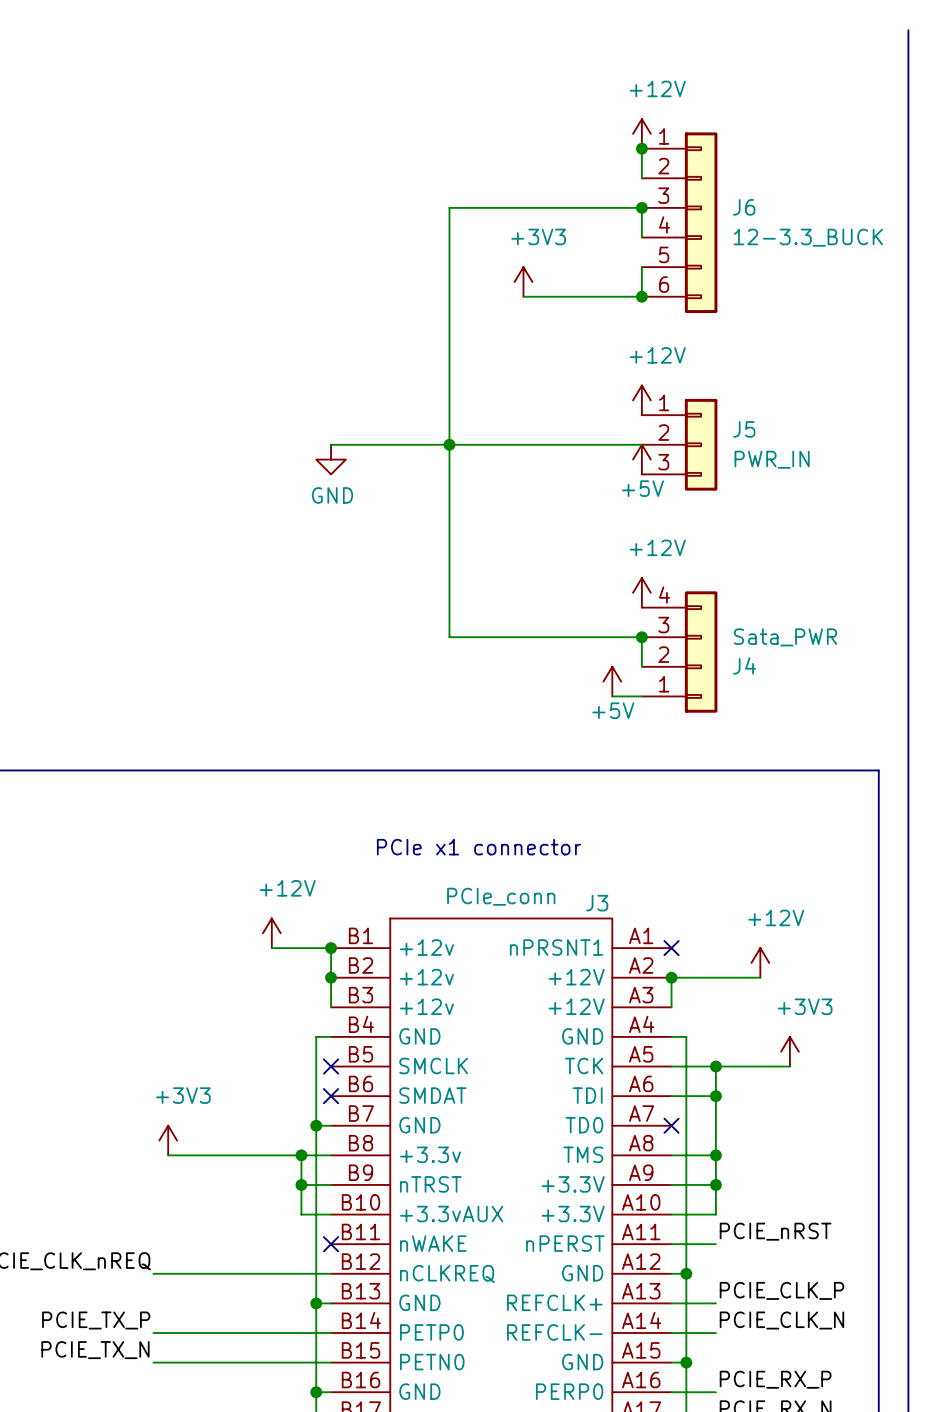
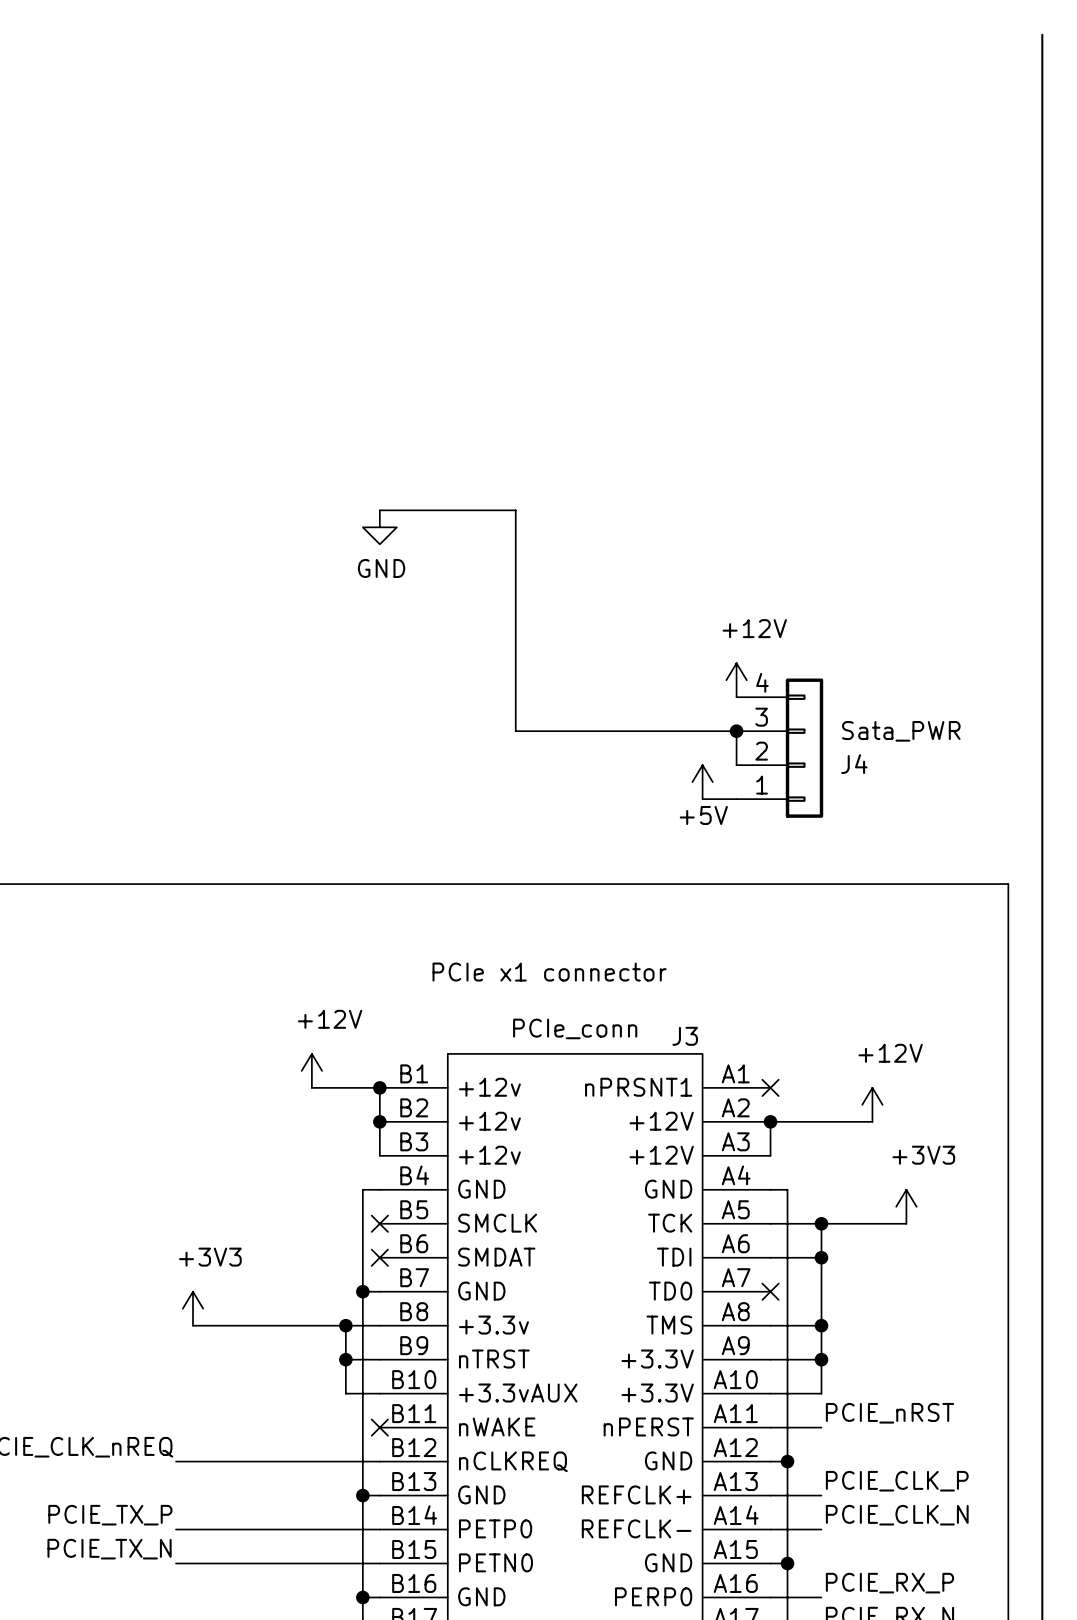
power symbol: +12V (641, 133) -> none
wire: (641, 148) (641, 178) -> none
junction: (641, 148) -> none
junction: (641, 207) -> none
J6: 12-3.3_BUCK (679, 222) -> none
wire: (641, 237) (641, 207) (449, 207) (449, 444) (641, 444) -> none
wire: (641, 267) (641, 296) (523, 296) -> none
power symbol: +3V3 (523, 281) -> none
junction: (641, 296) -> none
power symbol: +12V (641, 400) -> none
junction: (449, 444) -> none
J5: PWR_IN (679, 444) -> none
power symbol: +5V (641, 459) -> none

